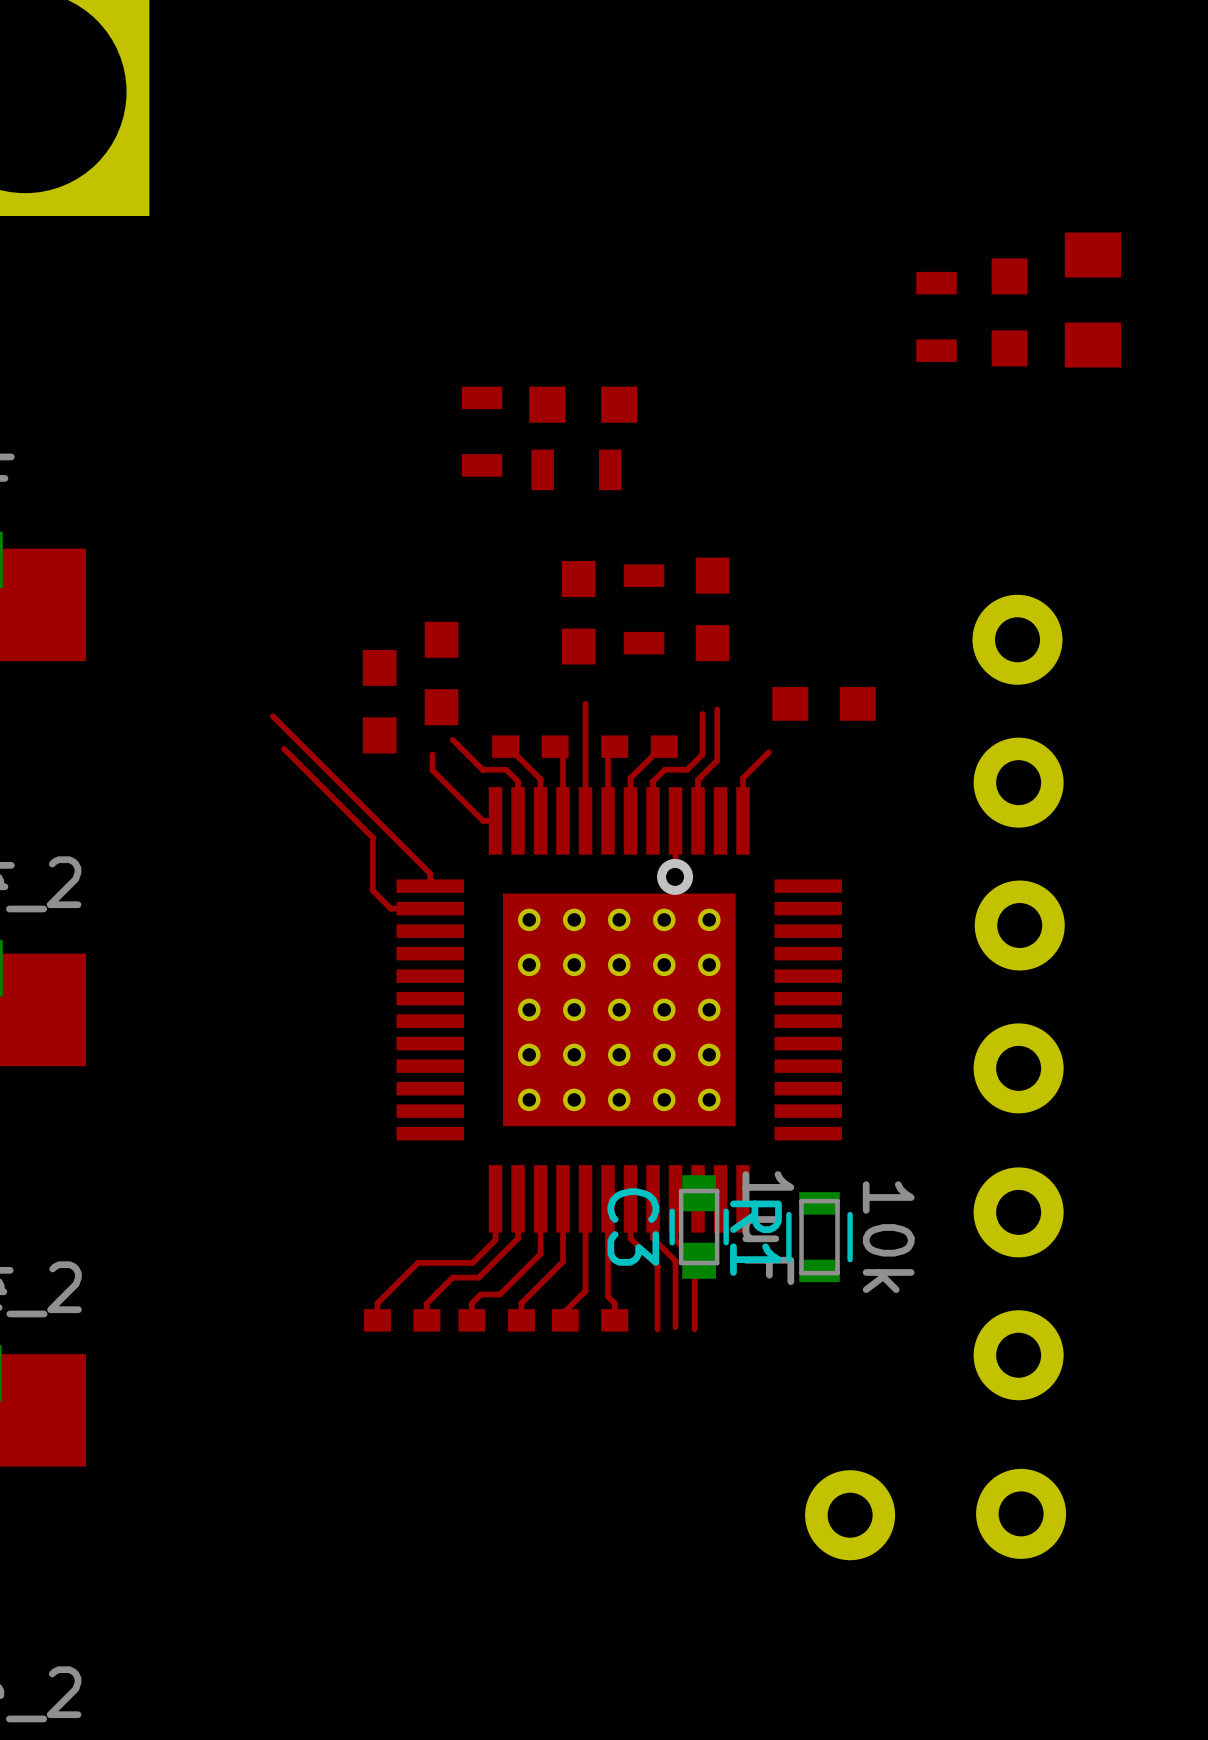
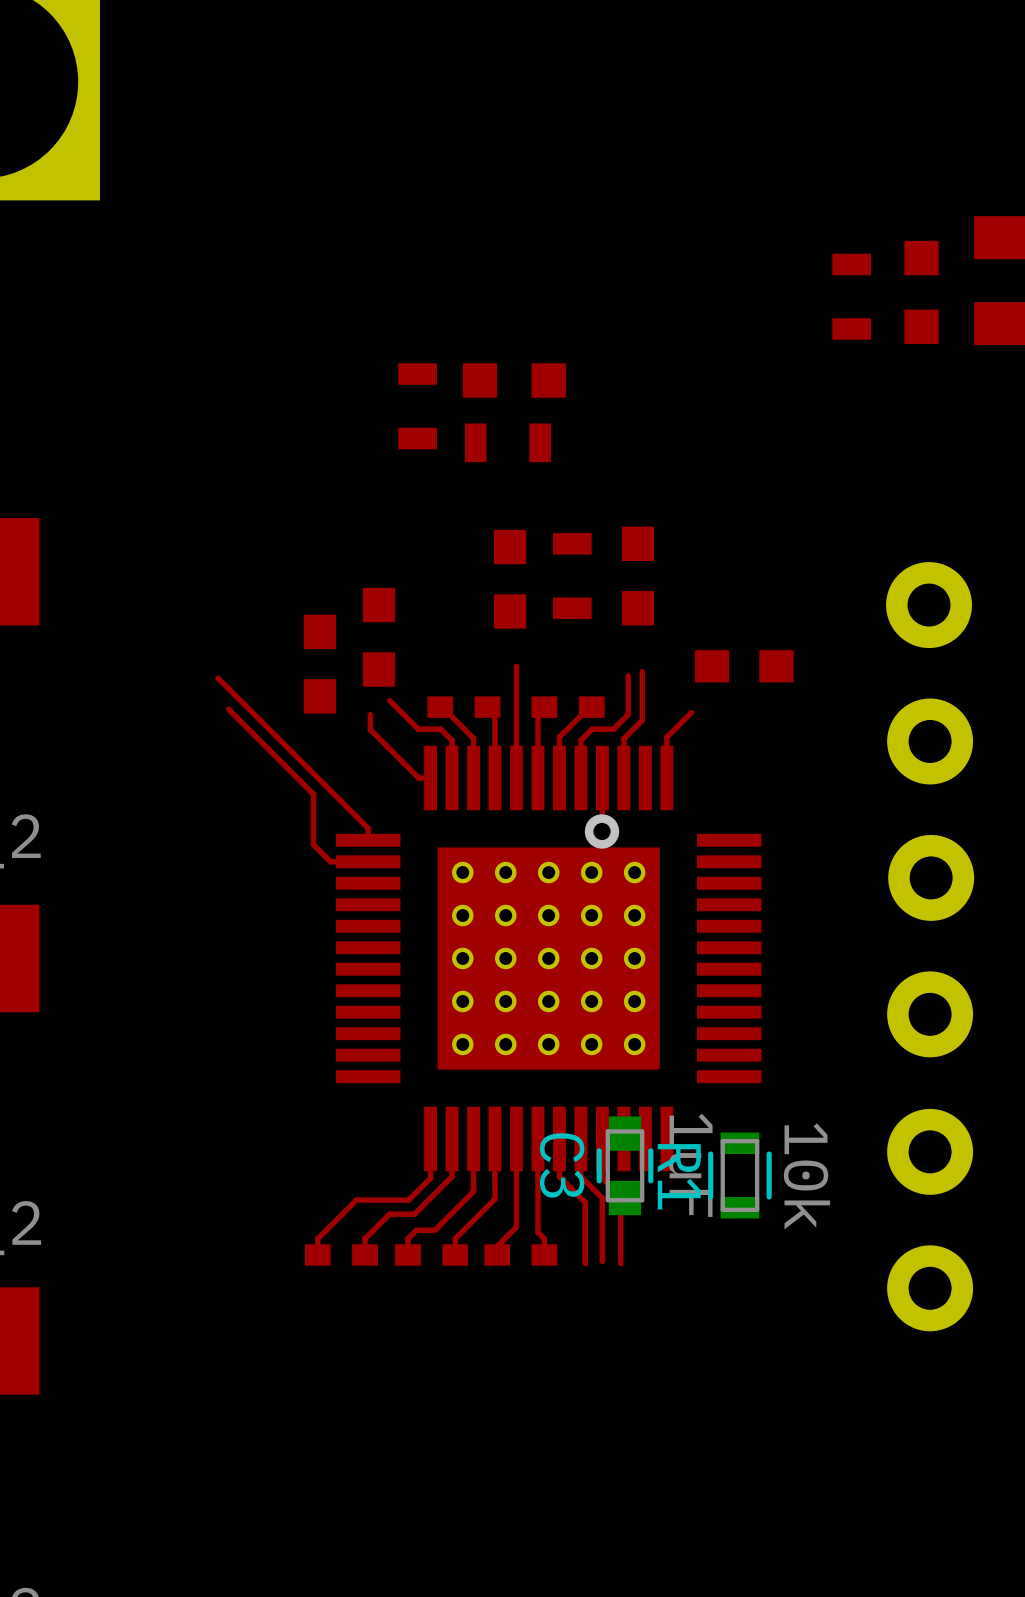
part: (1021, 1513) -> none
part: (850, 1515) -> none

